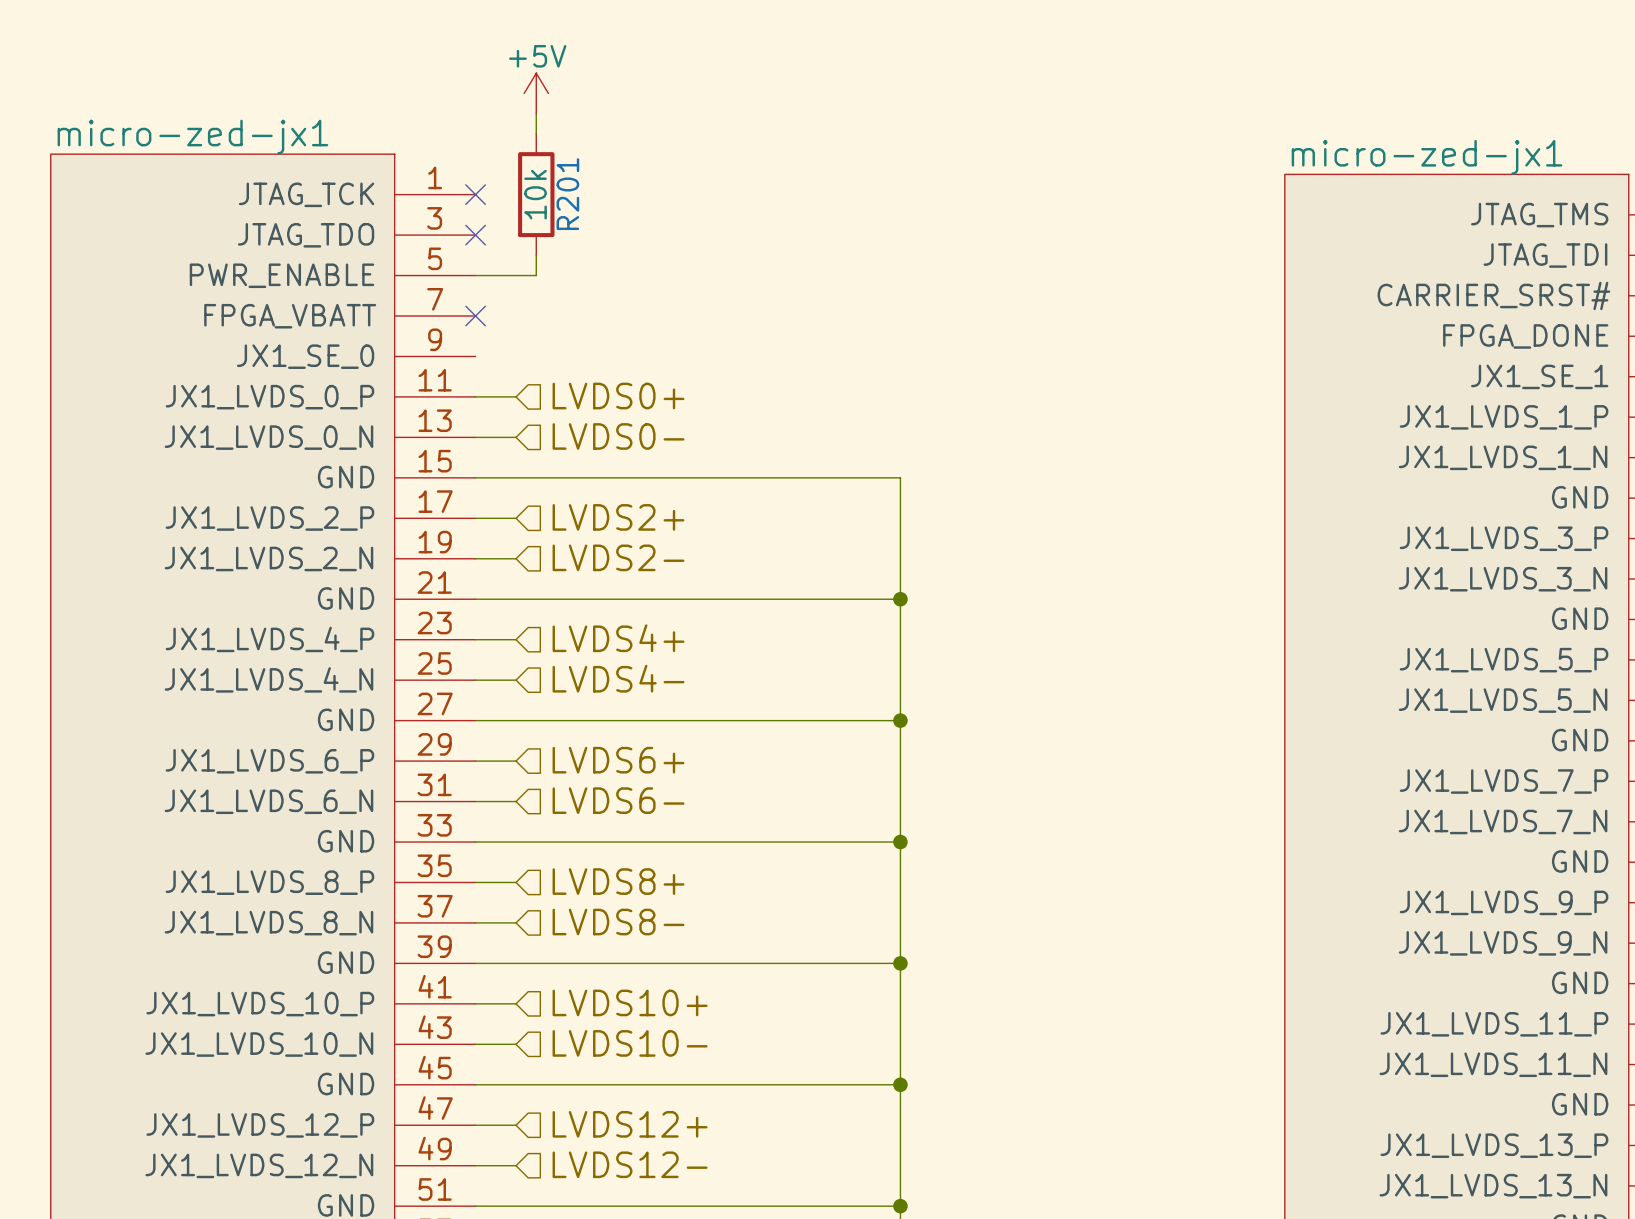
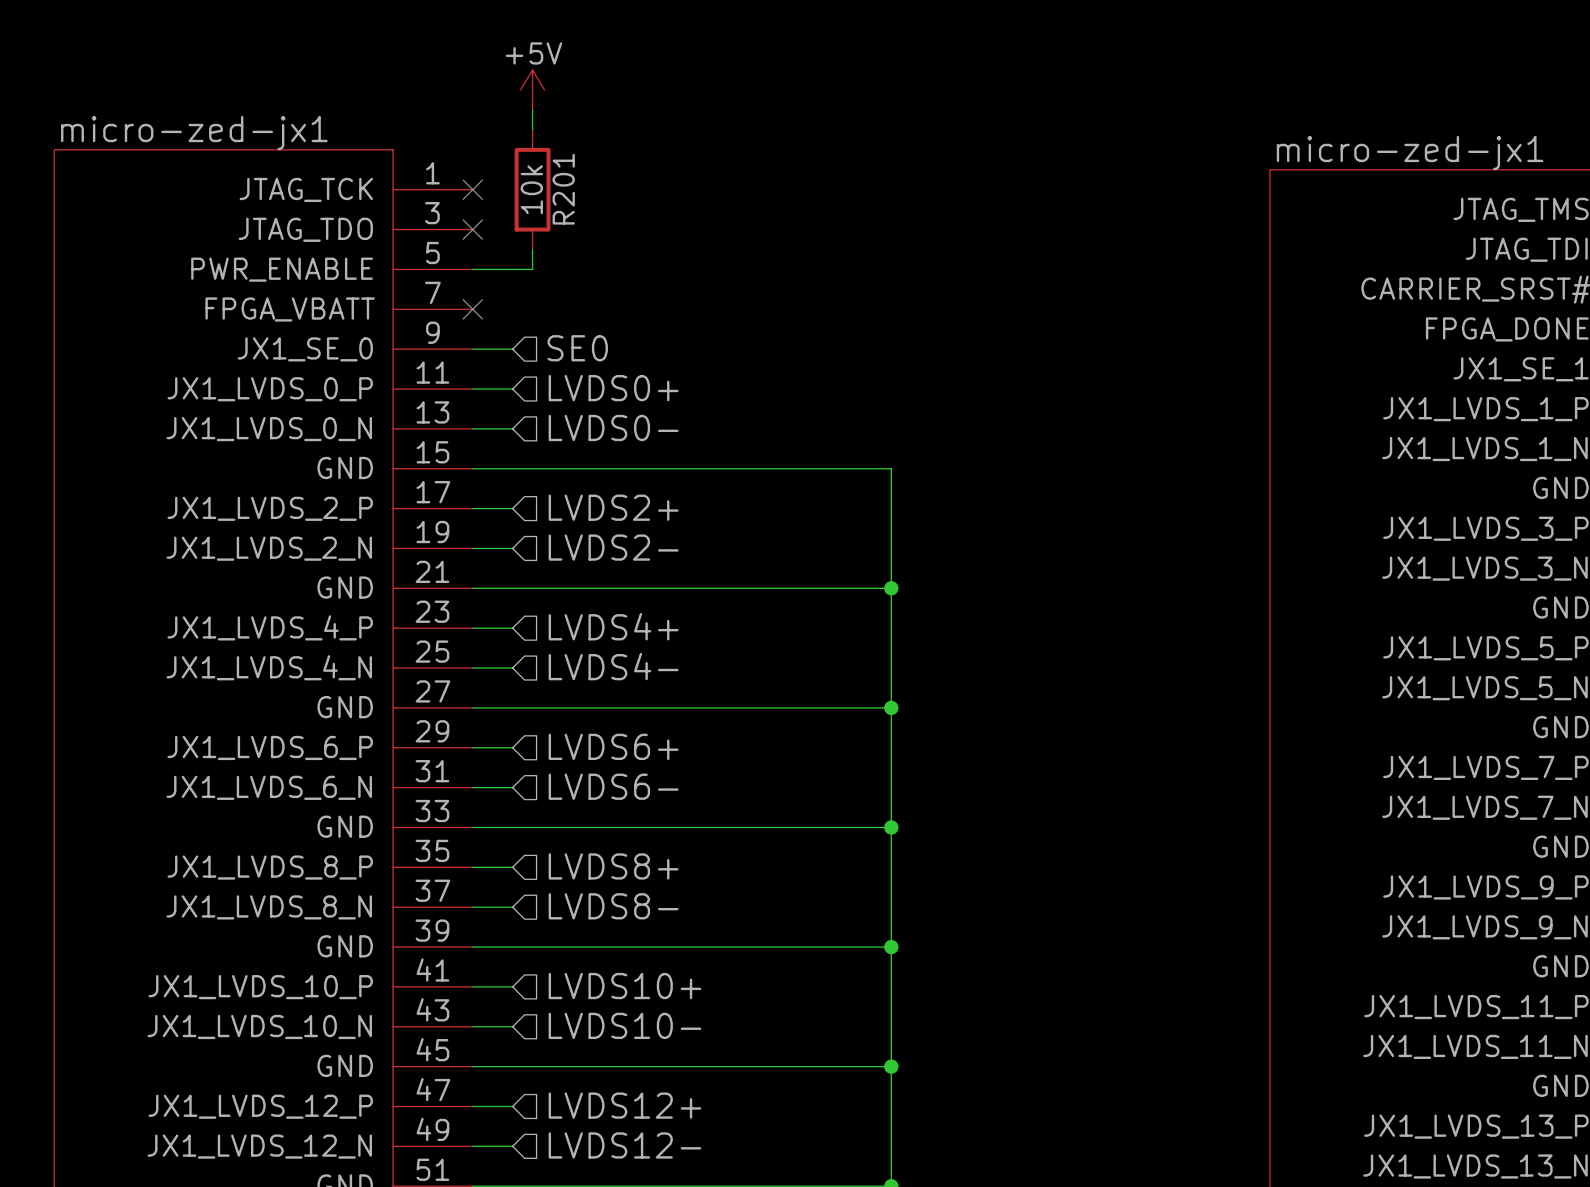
hierarchical label: none -> SE0 (577, 348)
wire: none -> (472, 349) (512, 349)

